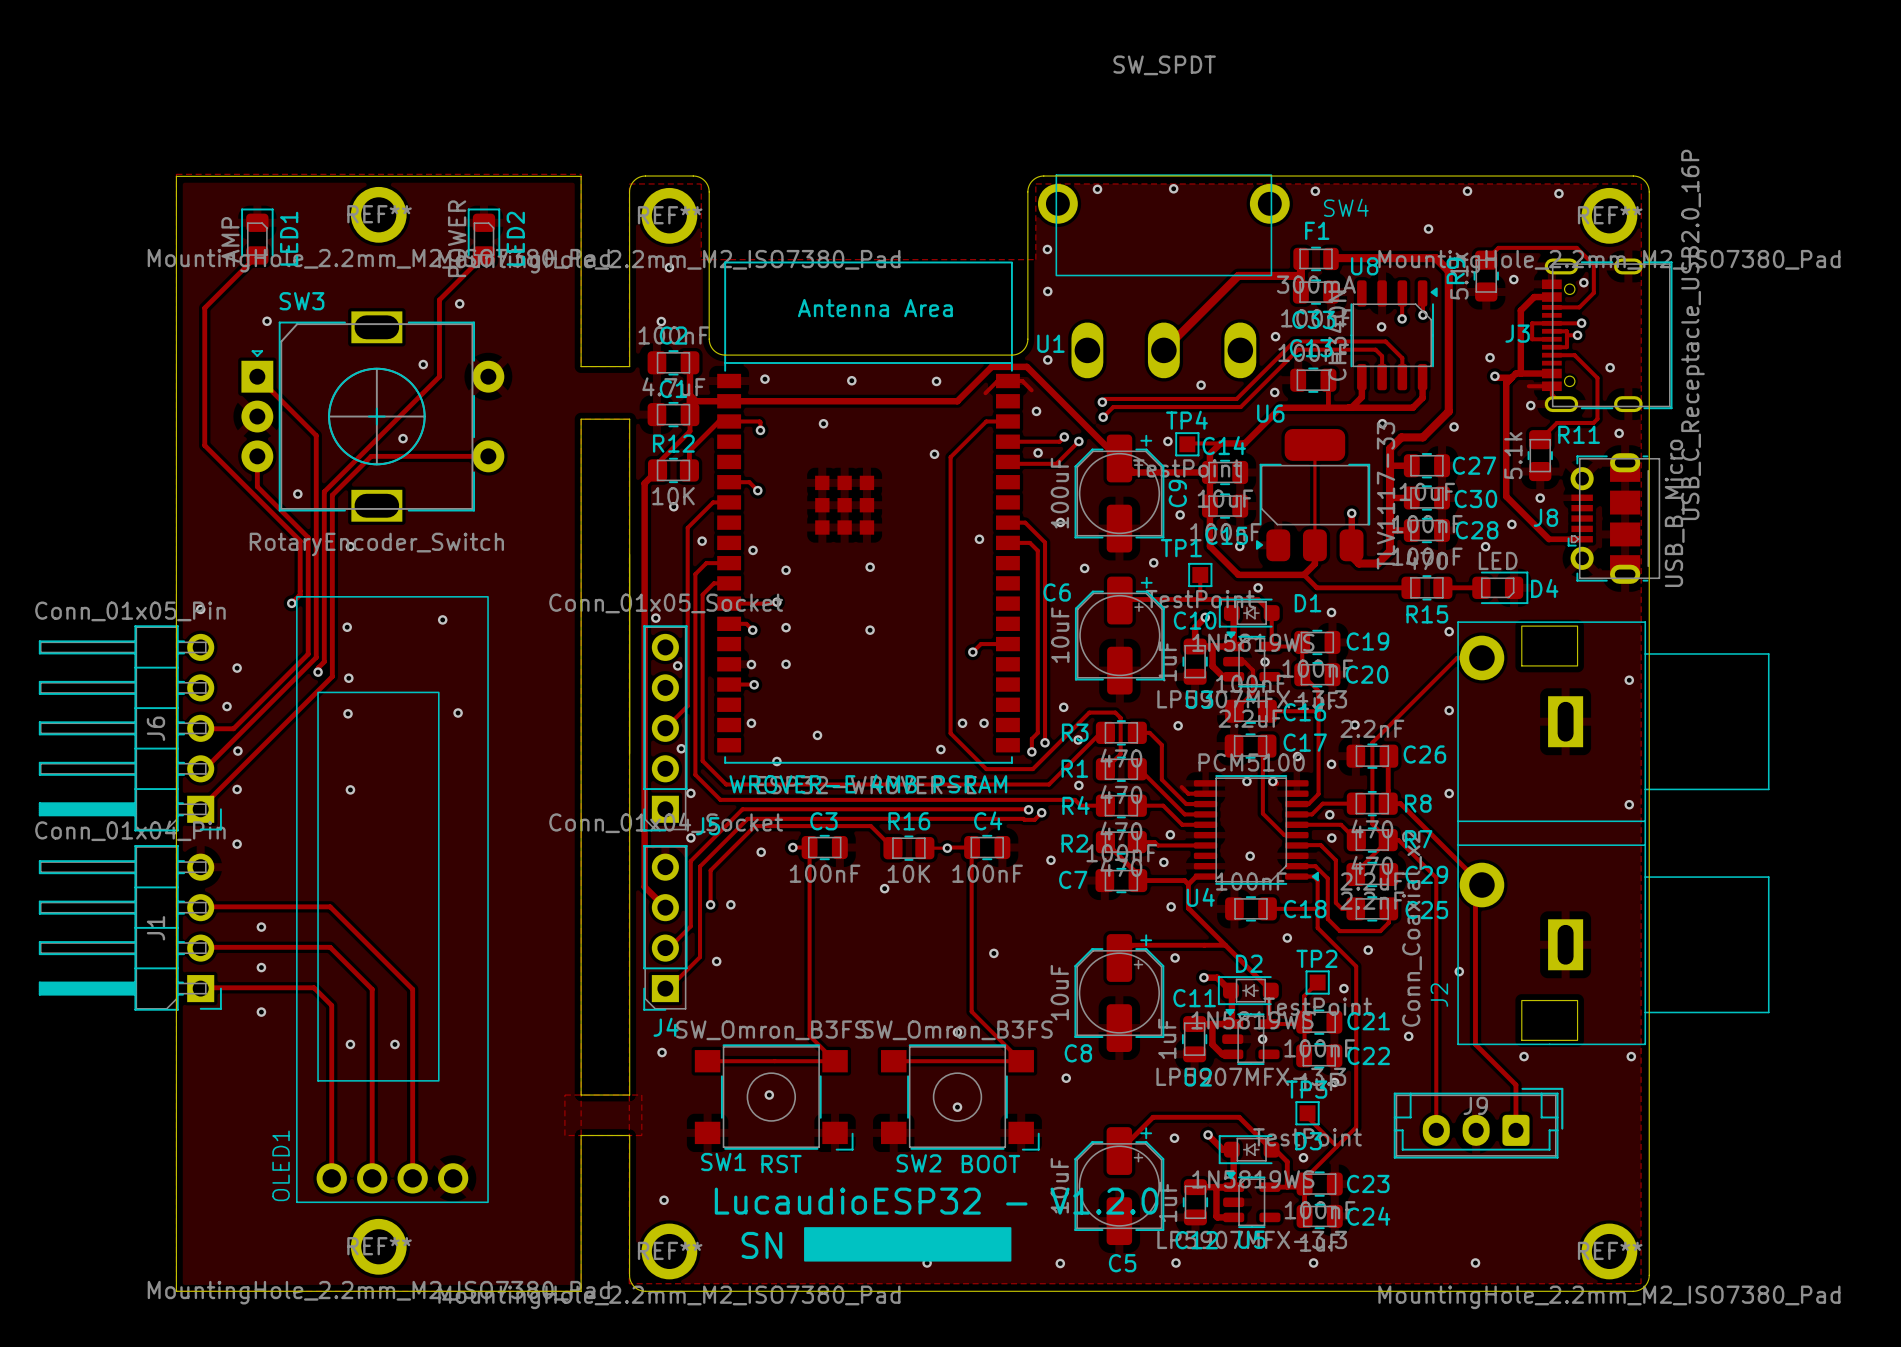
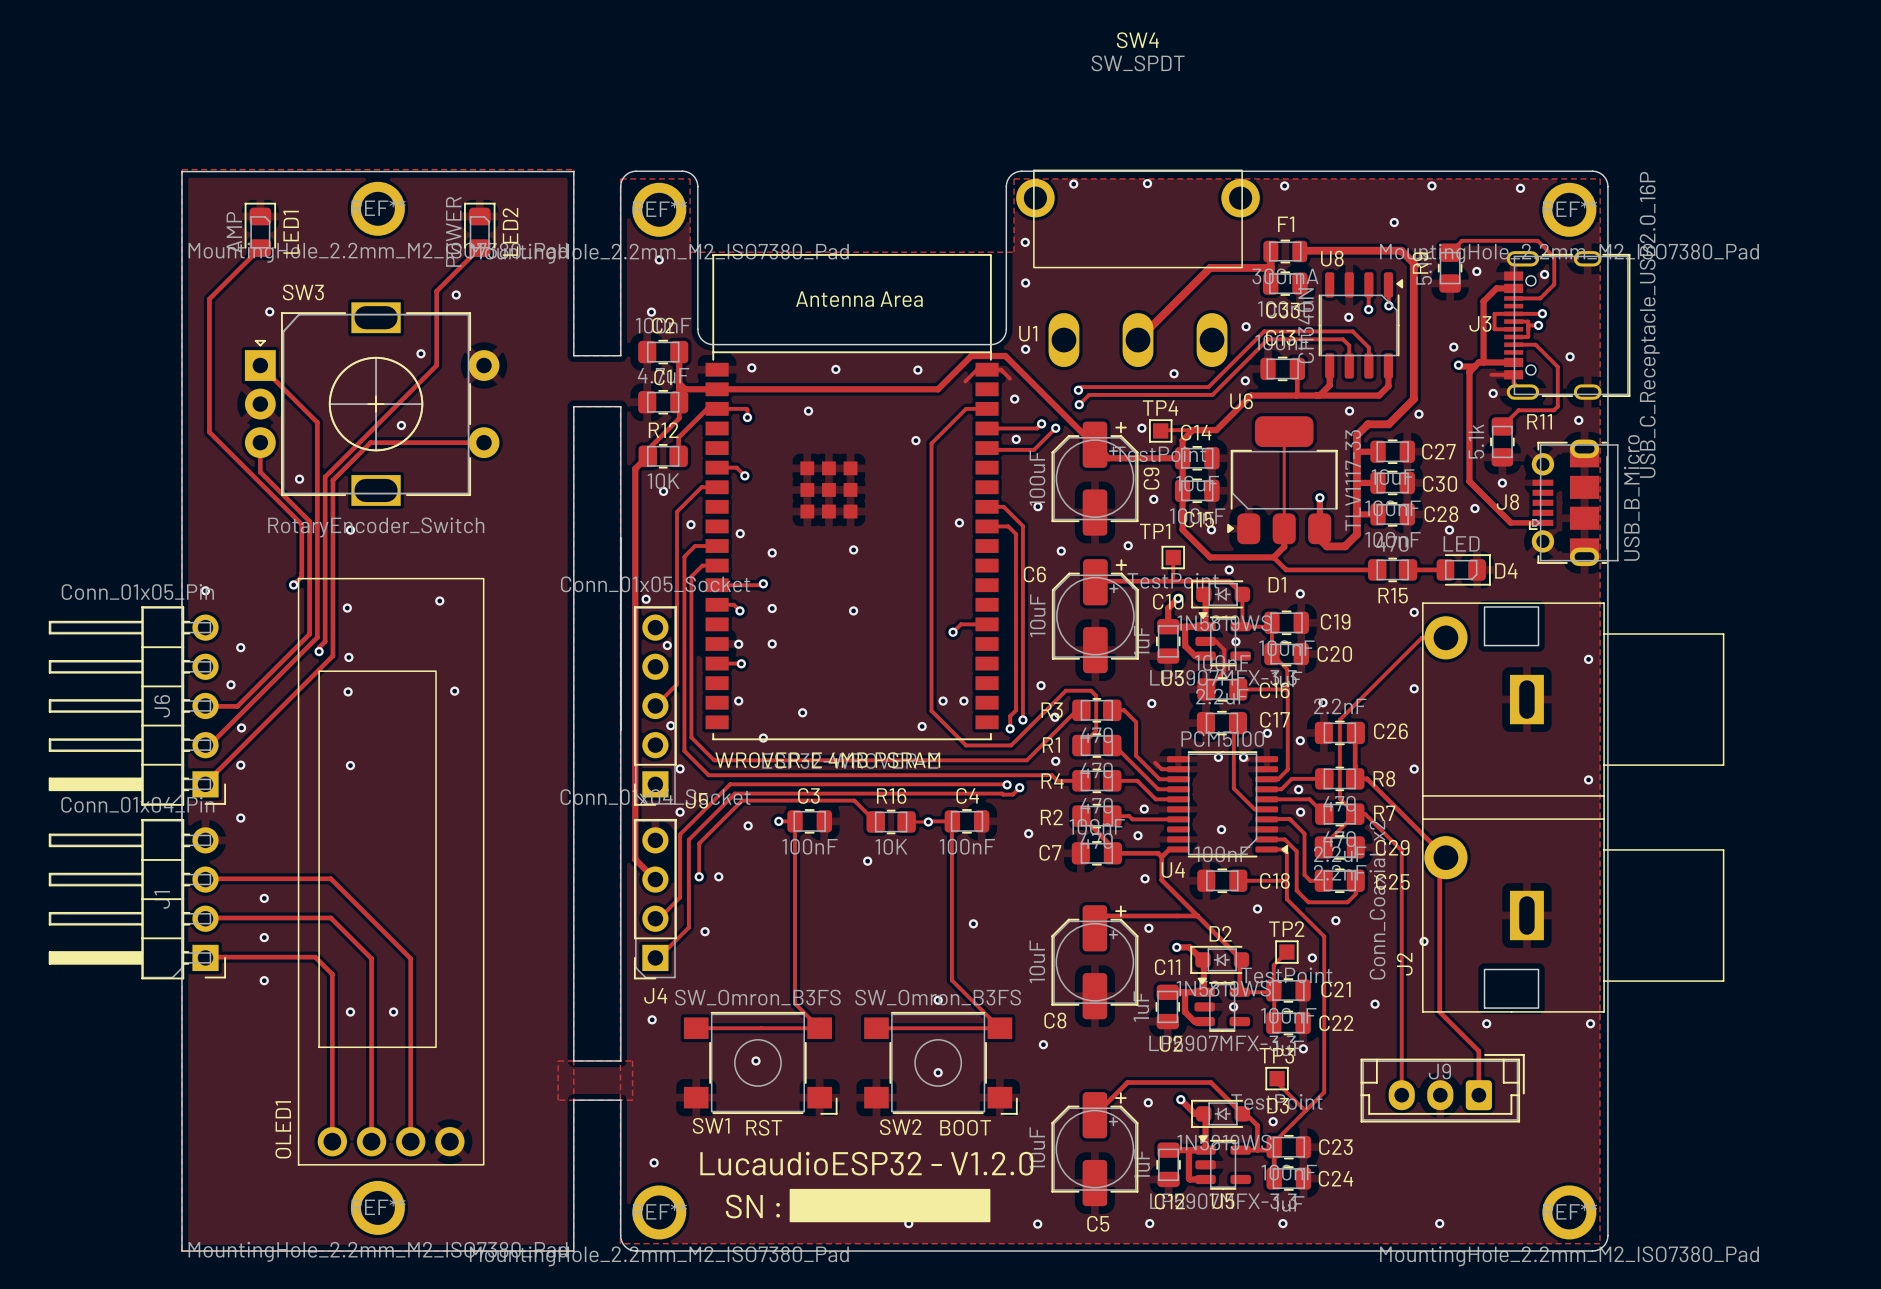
SW4 name position: SW4 (1346, 207) -> SW4 (1137, 40)

